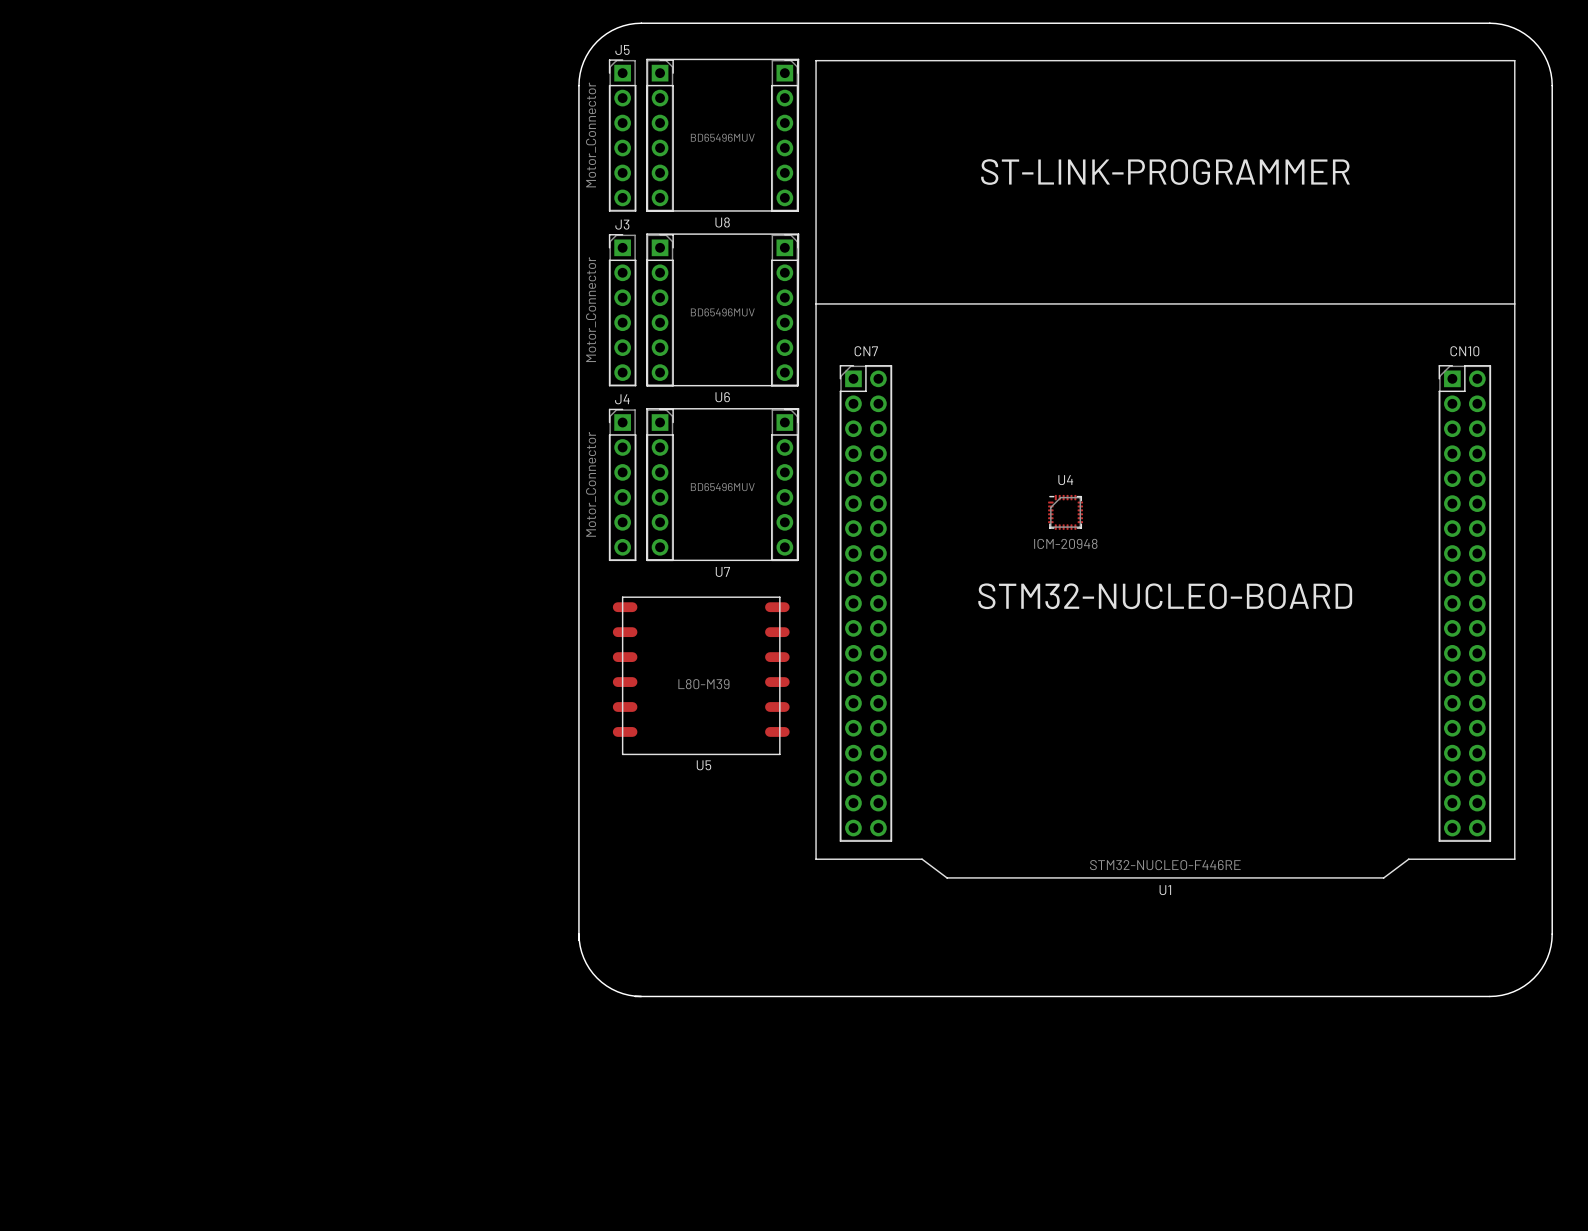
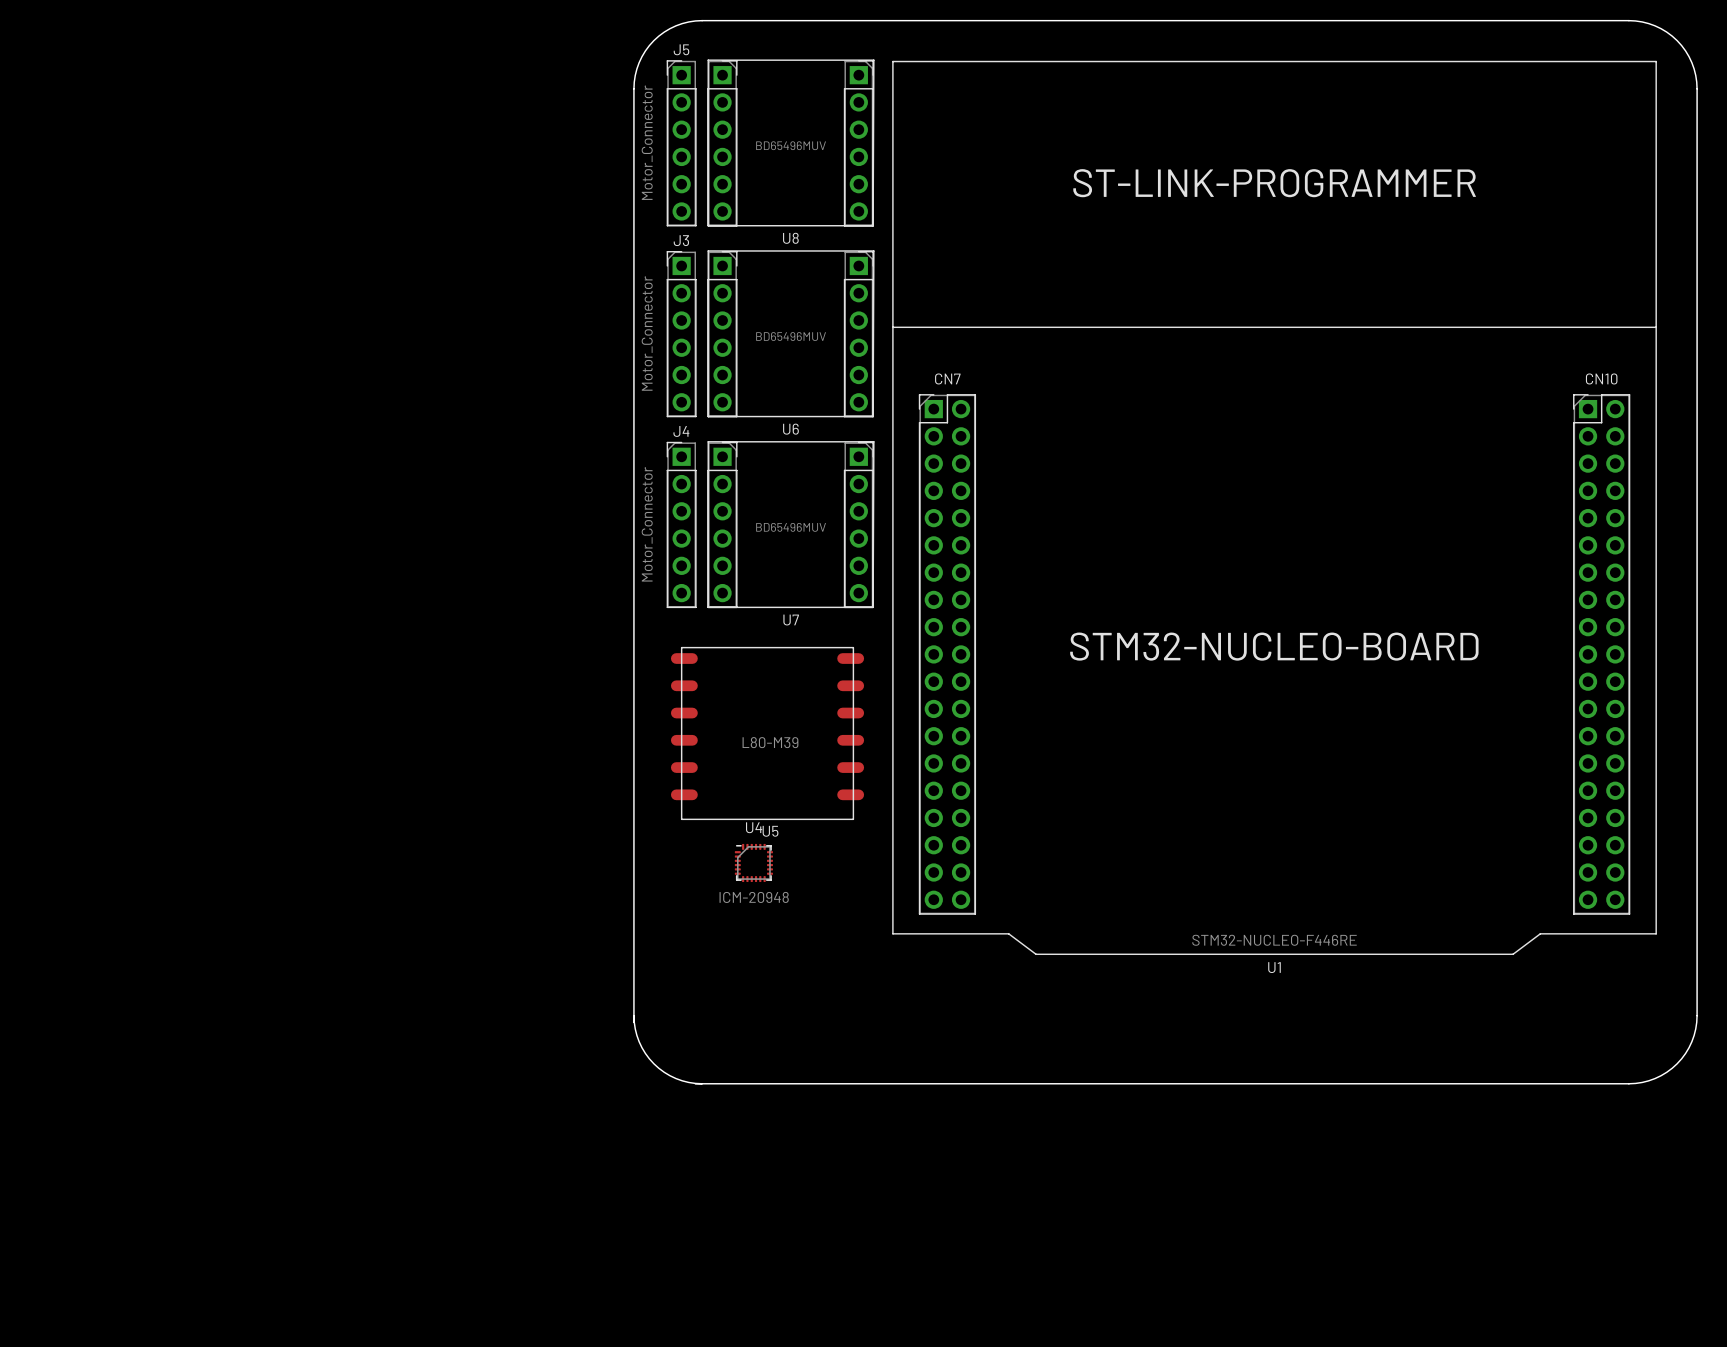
U4 position: (1065, 512) -> (753, 862)

